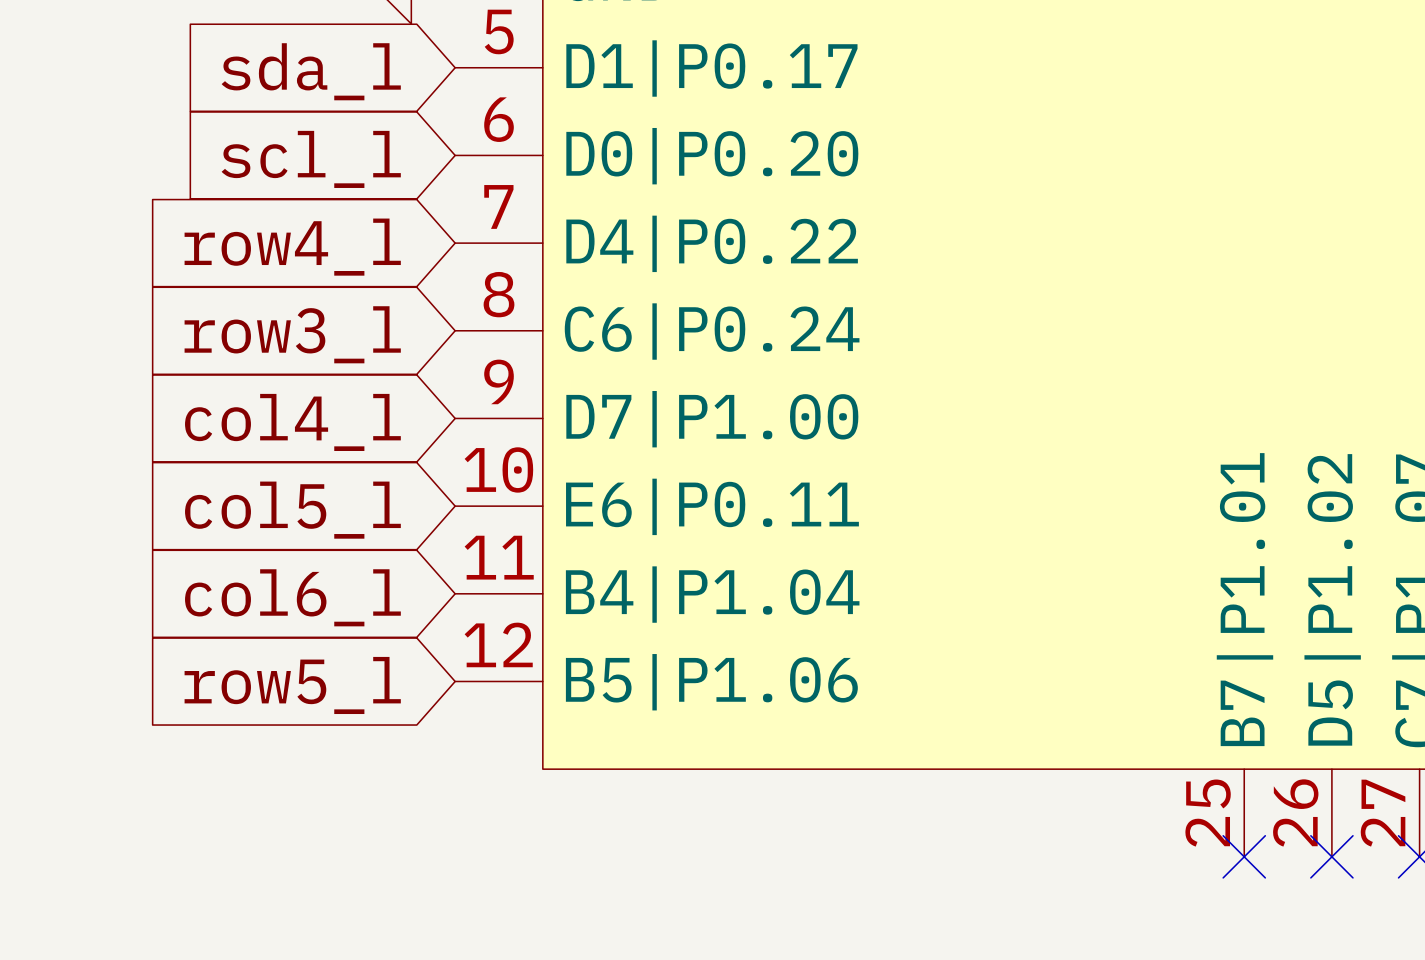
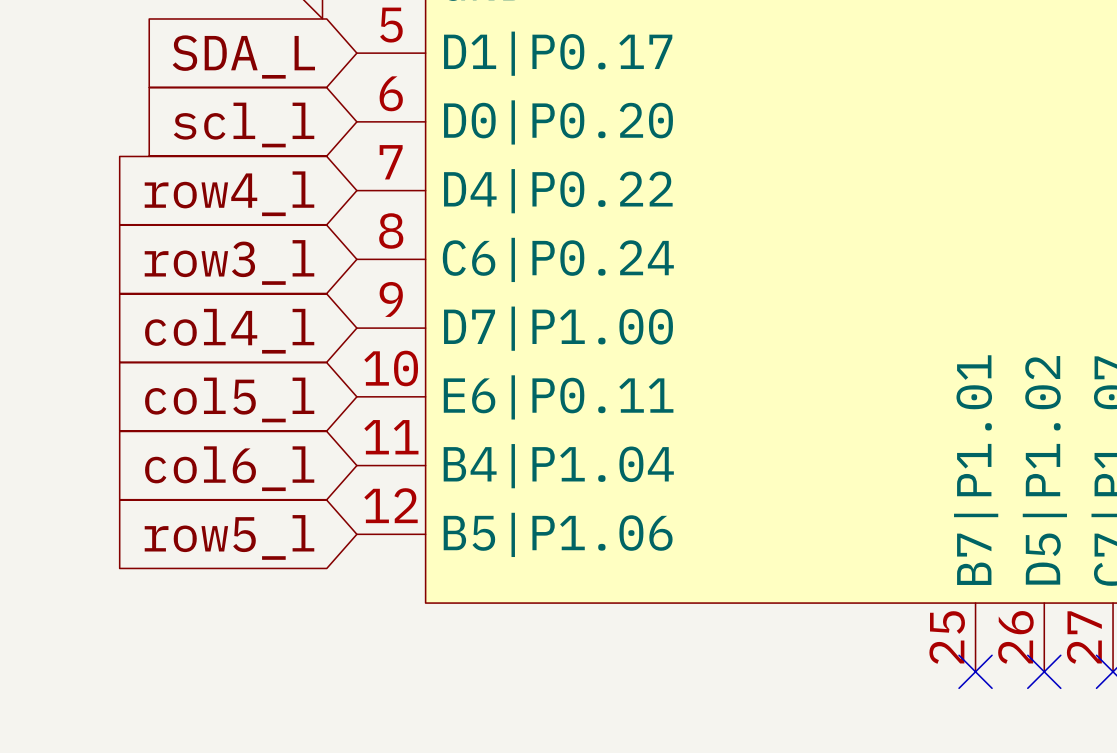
global label: sda_l (311, 71) -> SDA_L (243, 56)

